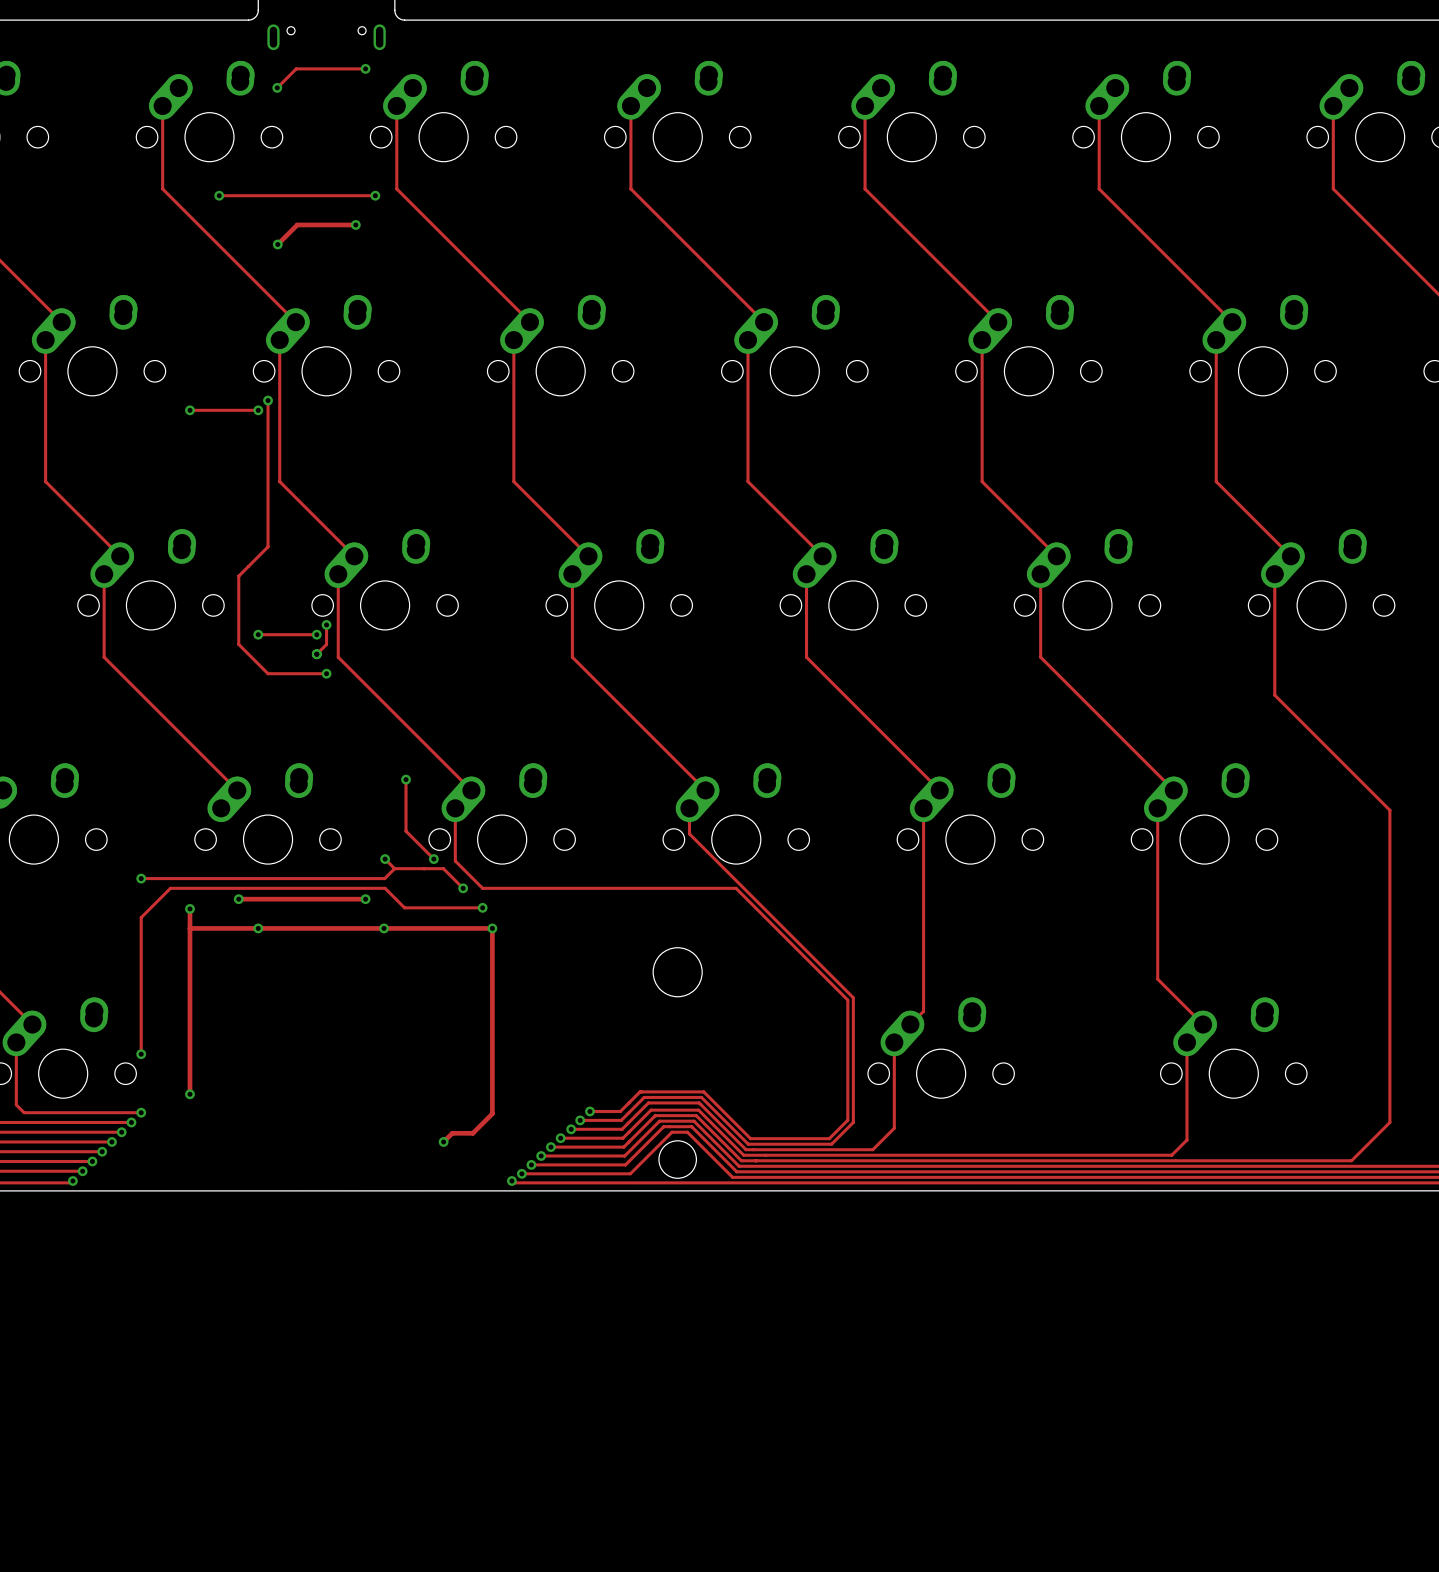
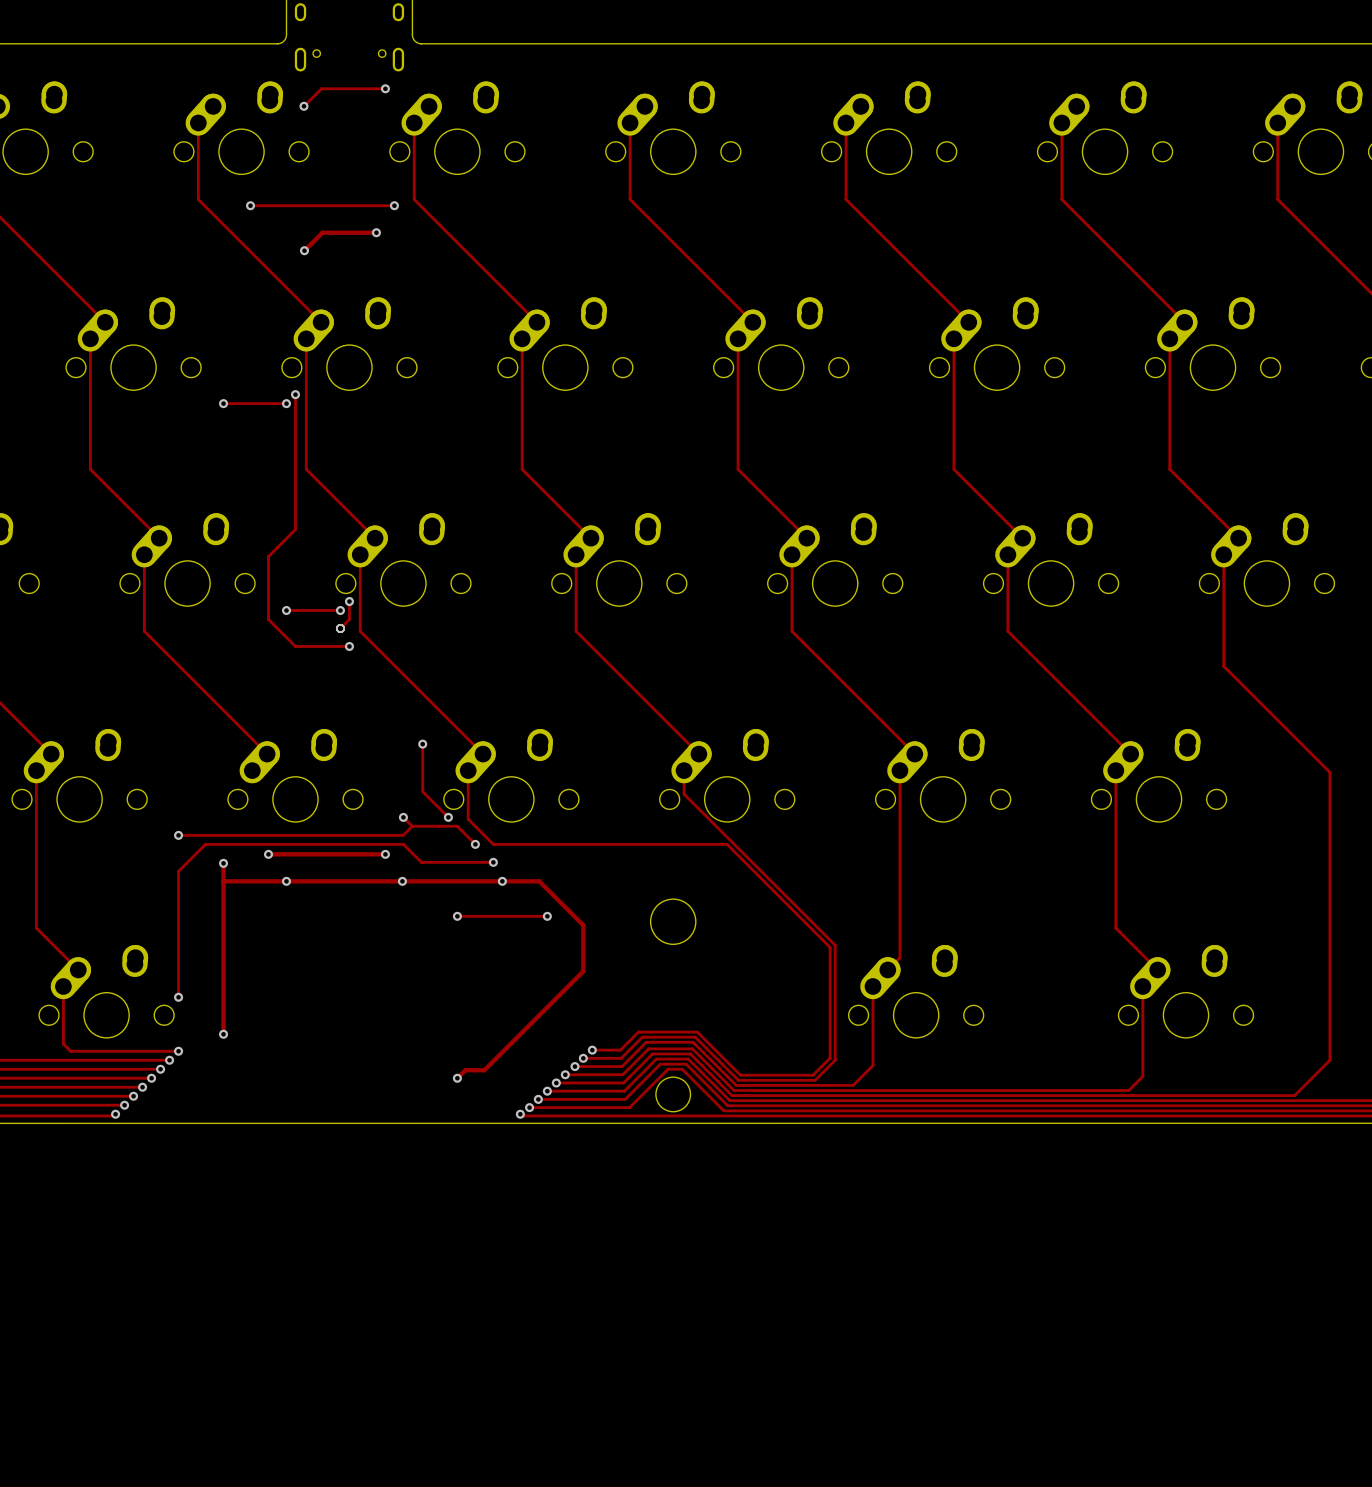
track: (492, 928) (492, 1113) (472, 1133) -> (502, 881) (539, 881) (583, 925) (583, 971) (484, 1070)
track: none -> (457, 916) (547, 916)
via: none -> (457, 916)
via: none -> (547, 916)

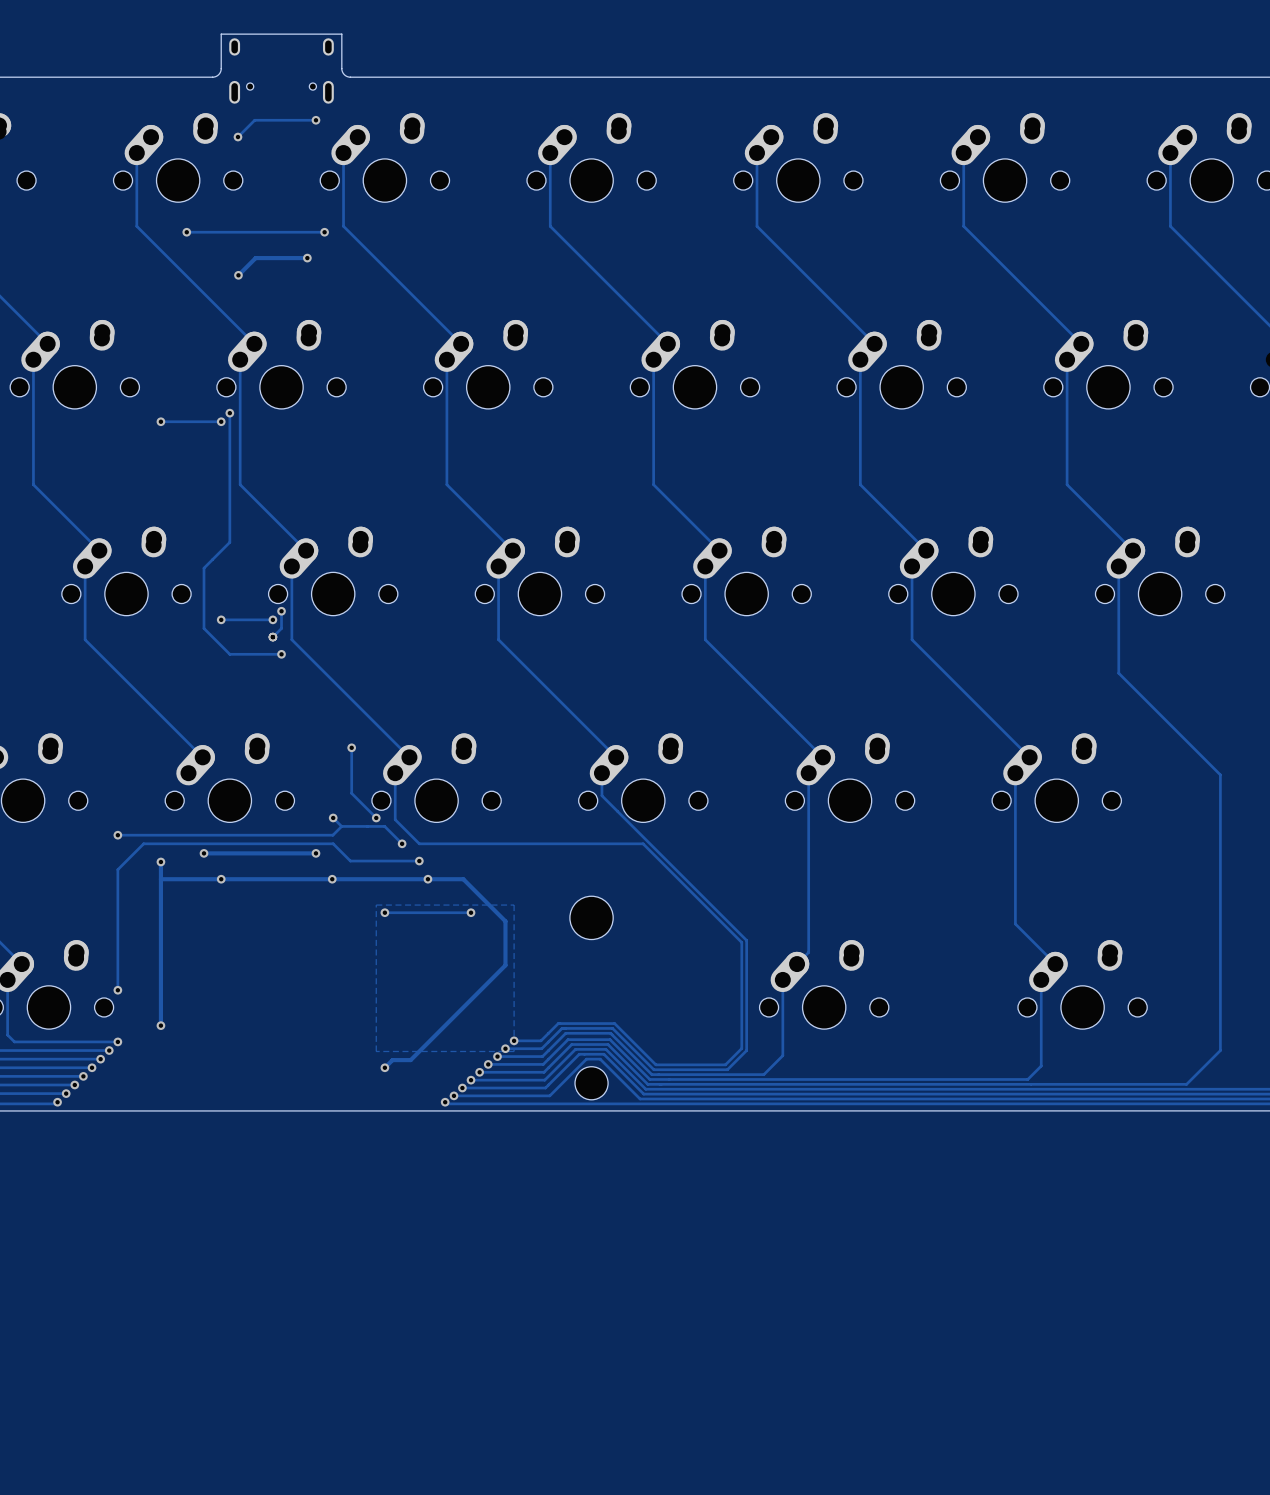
zone outline: none -> (376, 905) (376, 1051) (514, 1051) (514, 905) (376, 905)

